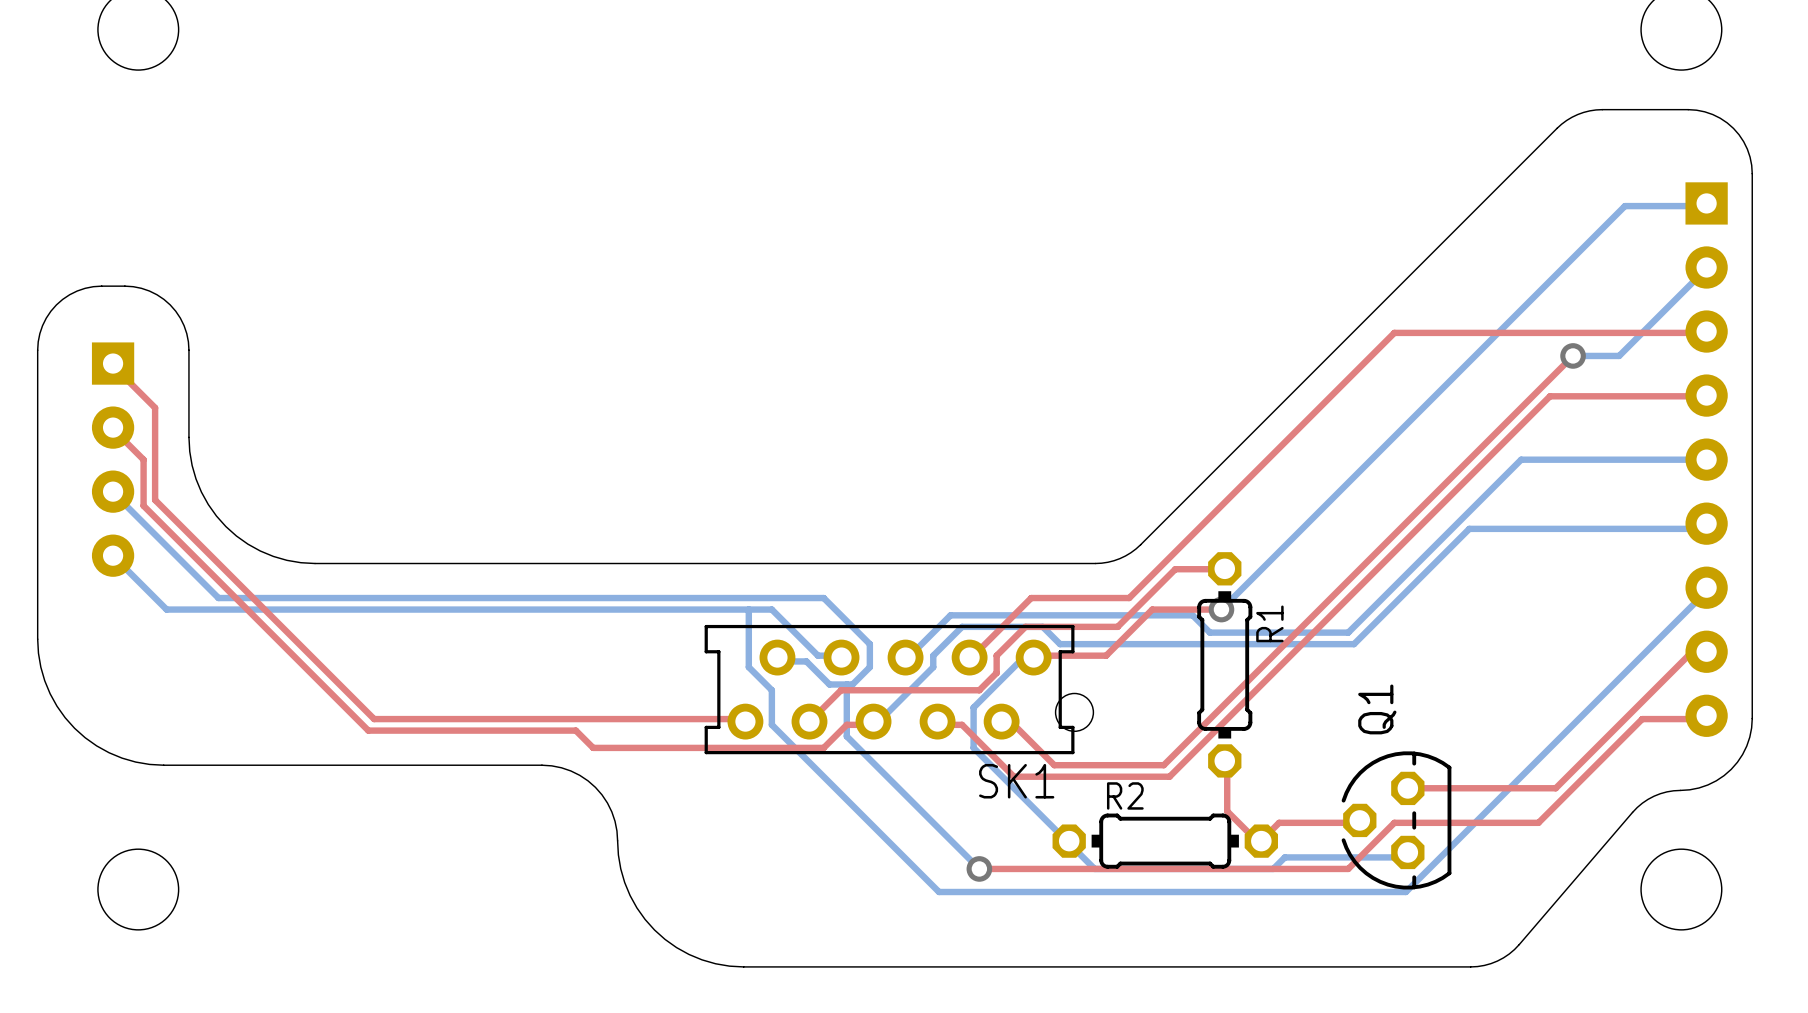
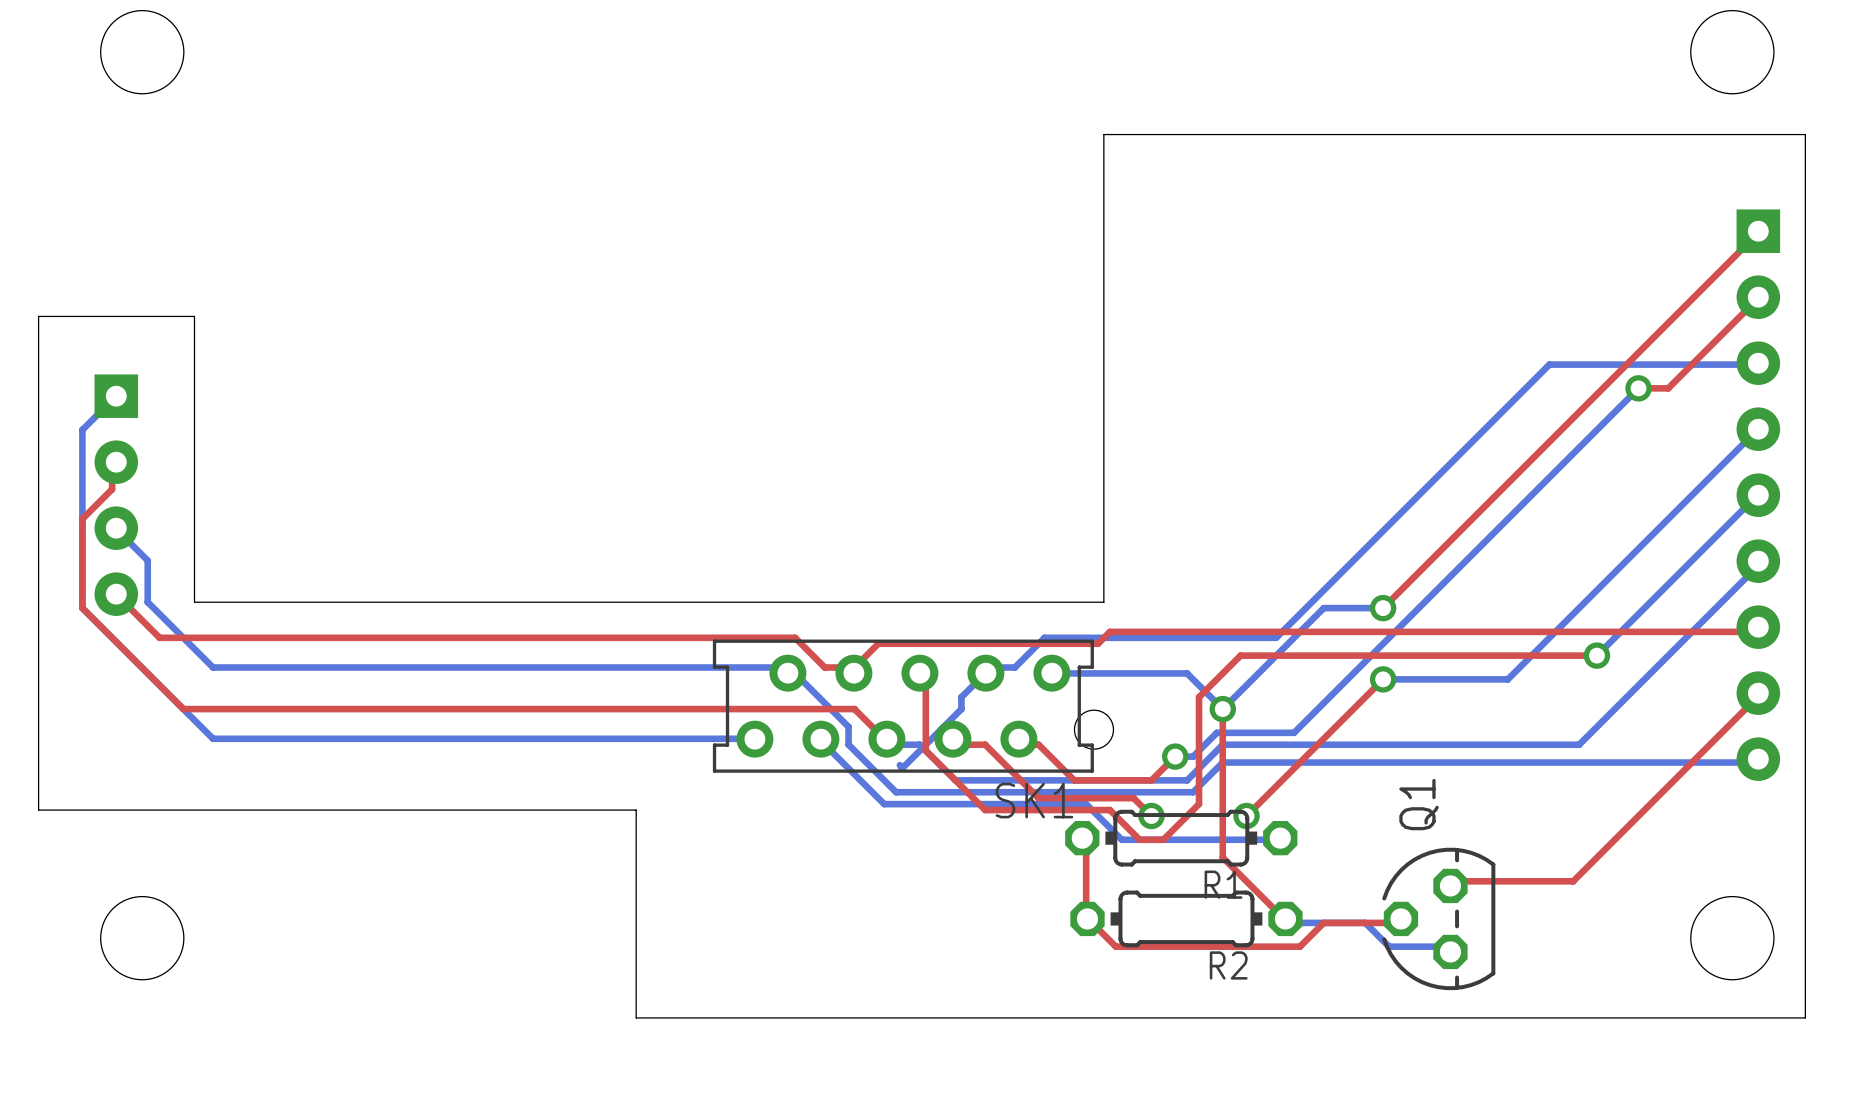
board edge: (1602, 109) (1577, 114) (1556, 128) (1135, 548) (1119, 558) (1107, 562) (1071, 563) -> (1650, 134) (1103, 134) (1103, 602)
board edge: (1688, 109) (1712, 114) (1733, 128) (1747, 149) (1752, 173) -> (1739, 134) (1805, 134) (1805, 200)
top track: none -> (1758, 231) (1383, 608)
bottom track: (1706, 203) (1705, 206) (1624, 206) (1221, 609) -> none
top track: none -> (1758, 297) (1668, 388) (1638, 388)
bottom track: (1706, 267) (1619, 355) (1573, 355) -> none
board edge: (101, 286) (77, 291) (56, 304) (42, 325) (37, 350) -> (104, 316) (38, 316) (38, 382)
board edge: (124, 286) (149, 291) (170, 304) (184, 325) (188, 350) -> (128, 316) (194, 316) (194, 382)
top track: (1706, 331) (1394, 332) (1129, 598) (1031, 598) (969, 657) -> none
bottom track: none -> (1758, 363) (1549, 364) (1276, 637) (1044, 637) (1014, 667)
top track: (1573, 355) (1163, 765) (1077, 765) -> (1596, 655) (1240, 655) (1199, 697) (1199, 804) (1163, 839) (1139, 839) (1109, 810)
via position: (1573, 355) -> (1638, 388)
bottom track: none -> (1638, 388) (1294, 732) (1216, 732) (1193, 756) (1175, 756)
top track: (113, 363) (155, 407) (155, 500) (374, 719) (743, 719) (745, 721) -> none
bottom track: none -> (116, 396) (82, 429) (82, 608) (213, 738) (754, 739)
top track: (1706, 395) (1550, 396) (1169, 776) (1013, 776) (962, 724) (939, 724) (937, 721) -> none
bottom track: none -> (1758, 429) (1507, 679) (1383, 679)
top track: (113, 427) (143, 459) (143, 505) (368, 730) (575, 730) (593, 747) (823, 747) (846, 724) (869, 724) (873, 721) -> (116, 462) (112, 465) (112, 489) (82, 519) (82, 608) (183, 709) (854, 709) (884, 738) (886, 739)
board edge: (188, 437) (189, 451) (196, 479) (208, 504) (225, 526) (247, 544) (273, 556) (300, 562) (315, 563) -> (194, 472) (194, 602) (324, 602)
bottom track: (1705, 459) (1521, 459) (1348, 632) (1209, 632) (1192, 615) (950, 615) (910, 655) (905, 657) -> (1757, 495) (1596, 655)
bottom track: (143, 523) (218, 598) (823, 598) (869, 644) (869, 667) (852, 684) (829, 684) (806, 661) (777, 661) (777, 657) -> (147, 560) (147, 602) (213, 667) (783, 667) (787, 673) (789, 667) (848, 726) (848, 744) (896, 792) (1193, 792) (1222, 762) (1757, 762) (1758, 759)
bottom track: (1705, 528) (1469, 528) (1354, 644) (1060, 644) (1042, 626) (985, 626) -> (1757, 566) (1579, 744) (1222, 744) (1187, 780) (955, 780) (919, 744) (890, 744) (886, 739)
top track: none -> (116, 594) (159, 637) (795, 637) (824, 667) (848, 667) (853, 673) (854, 667) (878, 643) (1098, 643) (1109, 631) (1757, 631) (1758, 627)
bottom track: (113, 555) (166, 609) (771, 609) (817, 655) (841, 655) (841, 657) -> none
top track: (1224, 568) (1175, 569) (1117, 626) (1025, 626) (996, 655) (996, 672) (979, 690) (841, 690) (809, 721) -> none
bottom track: none -> (1383, 608) (1323, 608) (1222, 709) (1187, 673) (1051, 673)
via: none -> (1383, 608)
bottom track: (1706, 587) (1705, 592) (1405, 892) (939, 892) (771, 724) (771, 690) (748, 667) (748, 609) -> none
top track: (1221, 609) (1152, 609) (1106, 655) (1037, 655) (1033, 657) -> none
via: (1221, 609) -> none
via: none -> (1596, 655)
top track: none -> (1383, 679) (1246, 815)
via: none -> (1383, 679)
board edge: (37, 639) (38, 653) (44, 680) (57, 706) (74, 728) (96, 745) (122, 758) (149, 764) (163, 765) -> (38, 680) (38, 810) (168, 810)
top track: (1705, 655) (1688, 655) (1555, 788) (1407, 788) -> none
bottom track: (1033, 657) (1031, 661) (1019, 661) (973, 707) (973, 747) (1065, 840) (1069, 841) (1094, 868) (1273, 868) (1284, 857) (1405, 857) (1407, 852) -> none
R1 rotation: 0° (1224, 664) -> 90° clockwise (1181, 838)
R1 position: (1224, 664) -> (1181, 838)
top track: none -> (1222, 709) (1222, 857) (1285, 918)
via: none -> (1222, 709)
bottom track: (846, 684) (846, 736) (979, 868) -> none
SK1 position: (899, 689) -> (913, 706)
bottom track: none -> (820, 739) (884, 804) (1086, 804) (1121, 839) (1276, 839) (1280, 838)
top track: none -> (952, 739) (955, 744) (985, 744) (1038, 798) (1133, 798) (1151, 815)
top track: none -> (1018, 739) (1020, 744) (1038, 744) (1074, 780) (1151, 780) (1175, 756)
via: none -> (1175, 756)
top track: (1706, 715) (1705, 719) (1642, 719) -> (1757, 697) (1691, 762)
board edge: (1752, 718) (1746, 746) (1731, 769) (1707, 784) (1689, 789) (1660, 793) (1642, 803) (1514, 949) (1491, 963) (1470, 966) -> (1805, 762) (1805, 1017) (1515, 1017)
top track: (1001, 721) (1002, 724) (1013, 724) (1054, 765) -> (919, 673) (925, 673) (925, 750) (985, 810) (1086, 810)
top track: (1224, 760) (1227, 765) (1227, 811) (1256, 840) (1261, 841) (1279, 822) (1359, 822) (1359, 820) -> none
board edge: (541, 765) (561, 767) (579, 775) (601, 794) (615, 821) (618, 854) (624, 882) (636, 907) (654, 930) (676, 947) (702, 959) (729, 966) (743, 966) -> (558, 810) (636, 810) (636, 1017) (766, 1017)
via: none -> (1151, 815)
via: none -> (1246, 815)
top track: none -> (1082, 838) (1086, 839) (1086, 916) (1115, 946) (1299, 946) (1323, 922) (1400, 922) (1400, 918)
R2 name position: R2 (1125, 795) -> R2 (1228, 965)
Q1 position: (1396, 820) -> (1438, 918)
top track: (1538, 822) (1394, 822) (1348, 868) (979, 868) -> (1585, 869) (1573, 881) (1454, 881) (1450, 885)
R2 position: (1165, 841) -> (1186, 918)
via: (979, 868) -> none
bottom track: none -> (1285, 918) (1288, 922) (1365, 922) (1389, 946) (1448, 946) (1450, 951)

